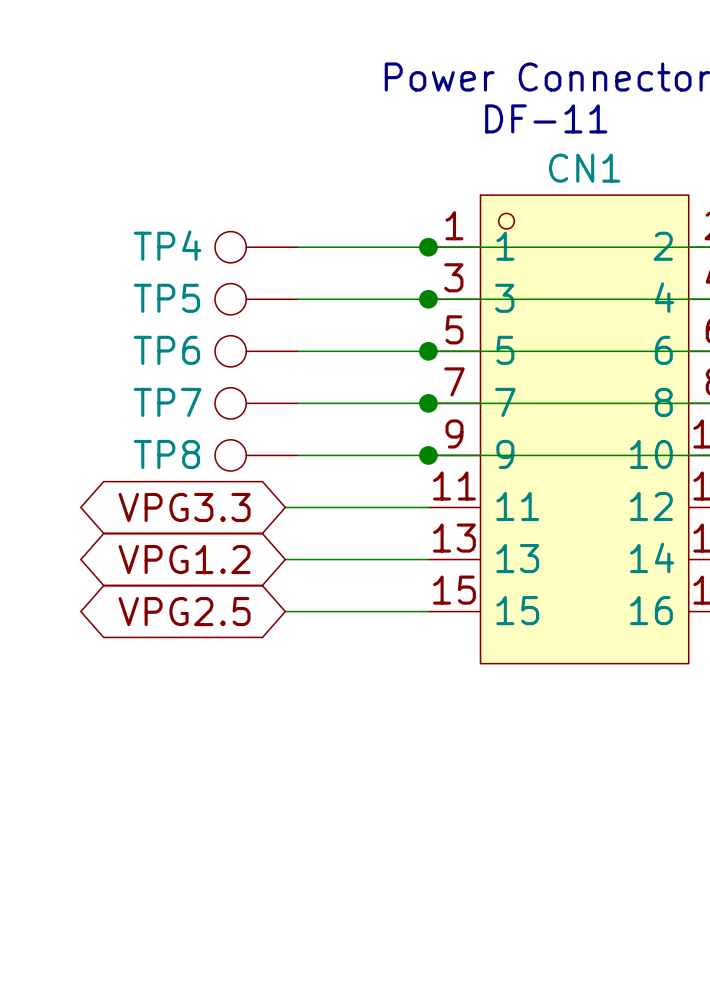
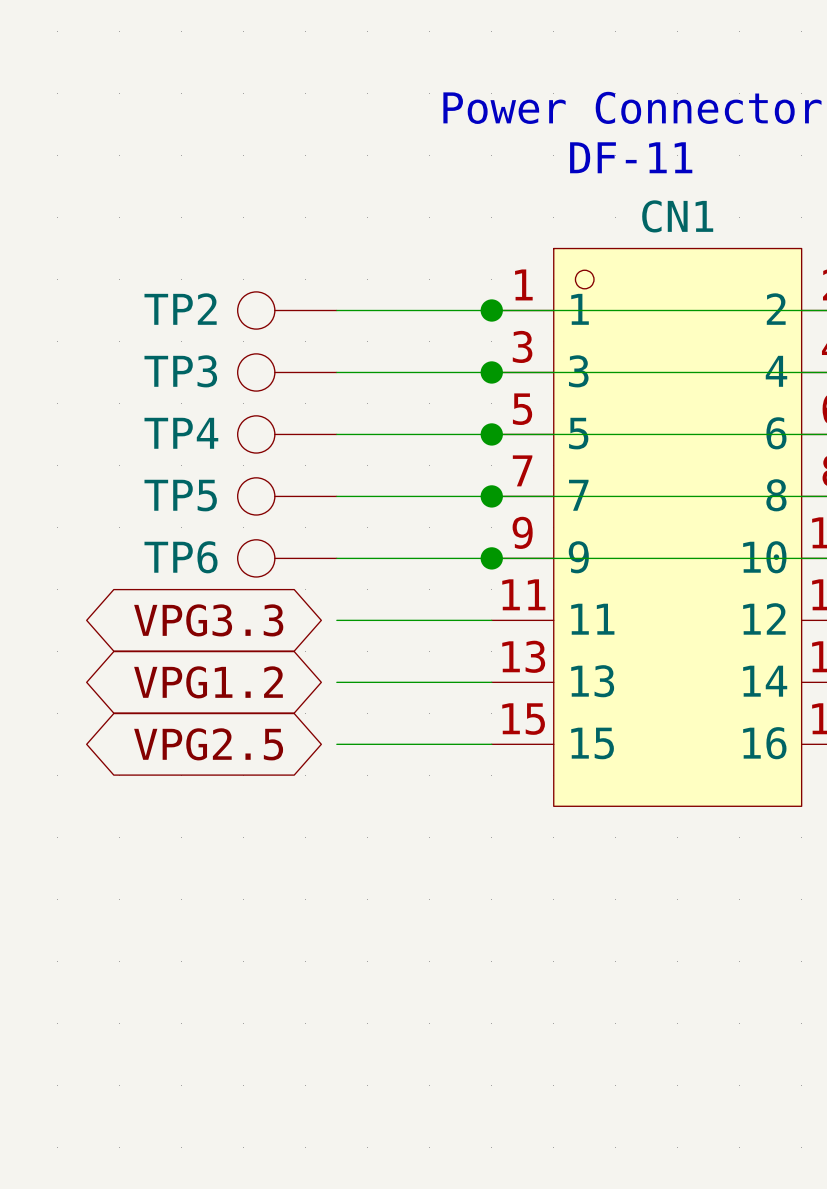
TP4 name: TP4 (167, 245) -> TP2 (180, 309)
TP5 name: TP5 (166, 298) -> TP3 (180, 371)
TP6 name: TP6 (166, 350) -> TP4 (181, 433)
TP7 name: TP7 (167, 402) -> TP5 (180, 495)
TP8 name: TP8 (166, 454) -> TP6 (181, 557)
wire: (285, 507) (298, 507) -> none
wire: (285, 559) (298, 559) -> none
wire: (285, 611) (298, 611) -> none

